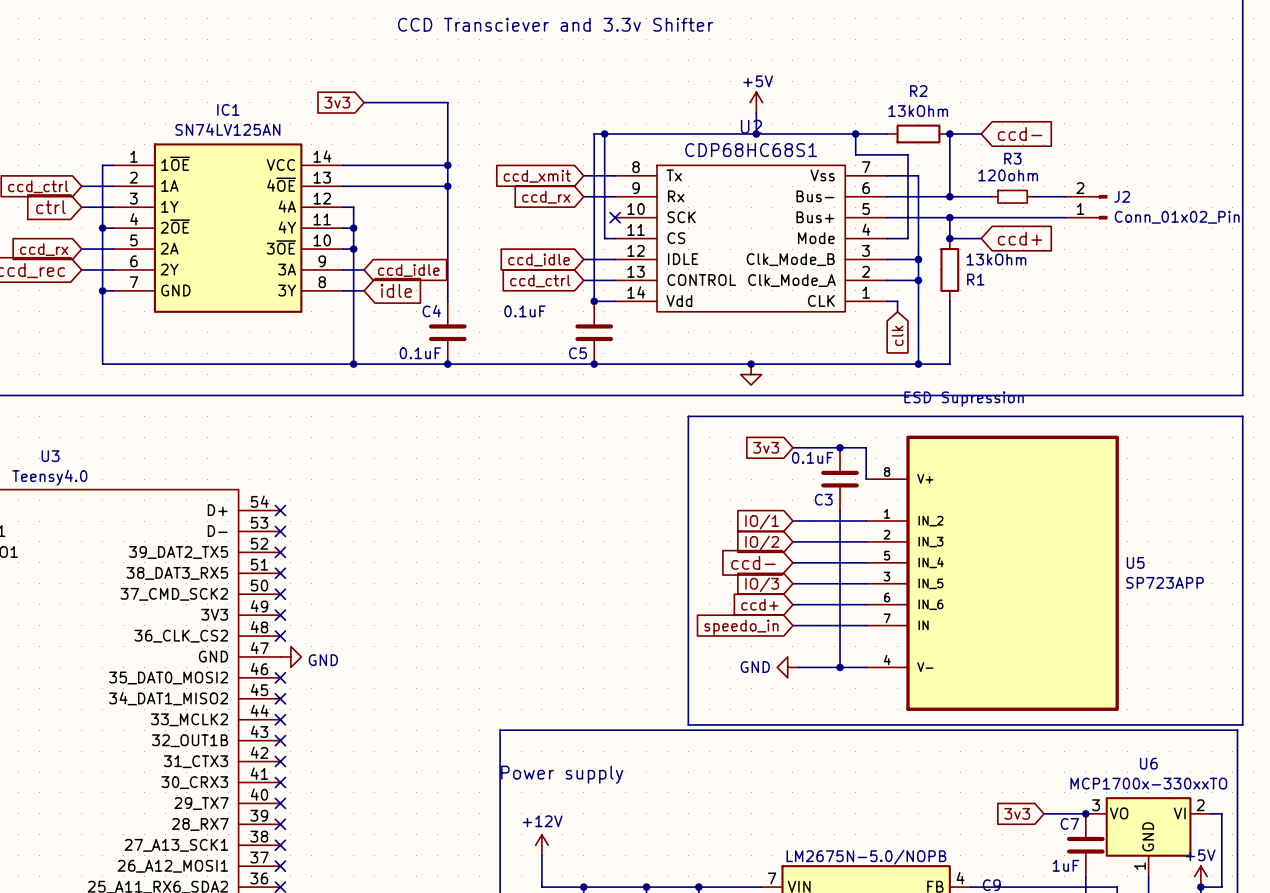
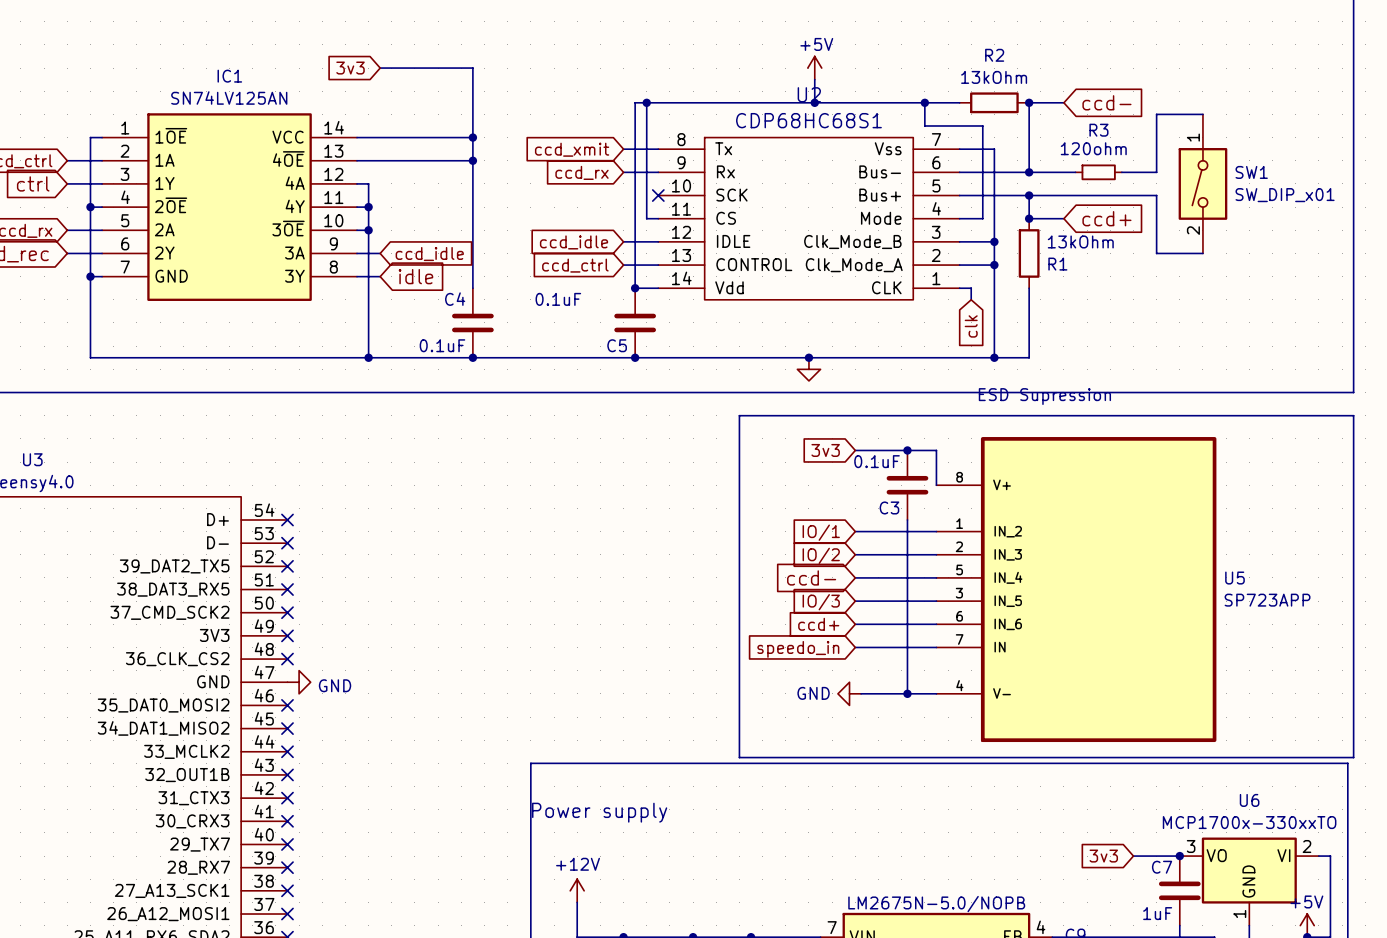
wire: none -> (1202, 114) (1156, 114) (1156, 172)
J2: Conn_01x02_Pin (1086, 207) -> none
SW1: none -> SW_DIP_x01 (1202, 183)
wire: none -> (1156, 195) (1156, 253) (1202, 253)

